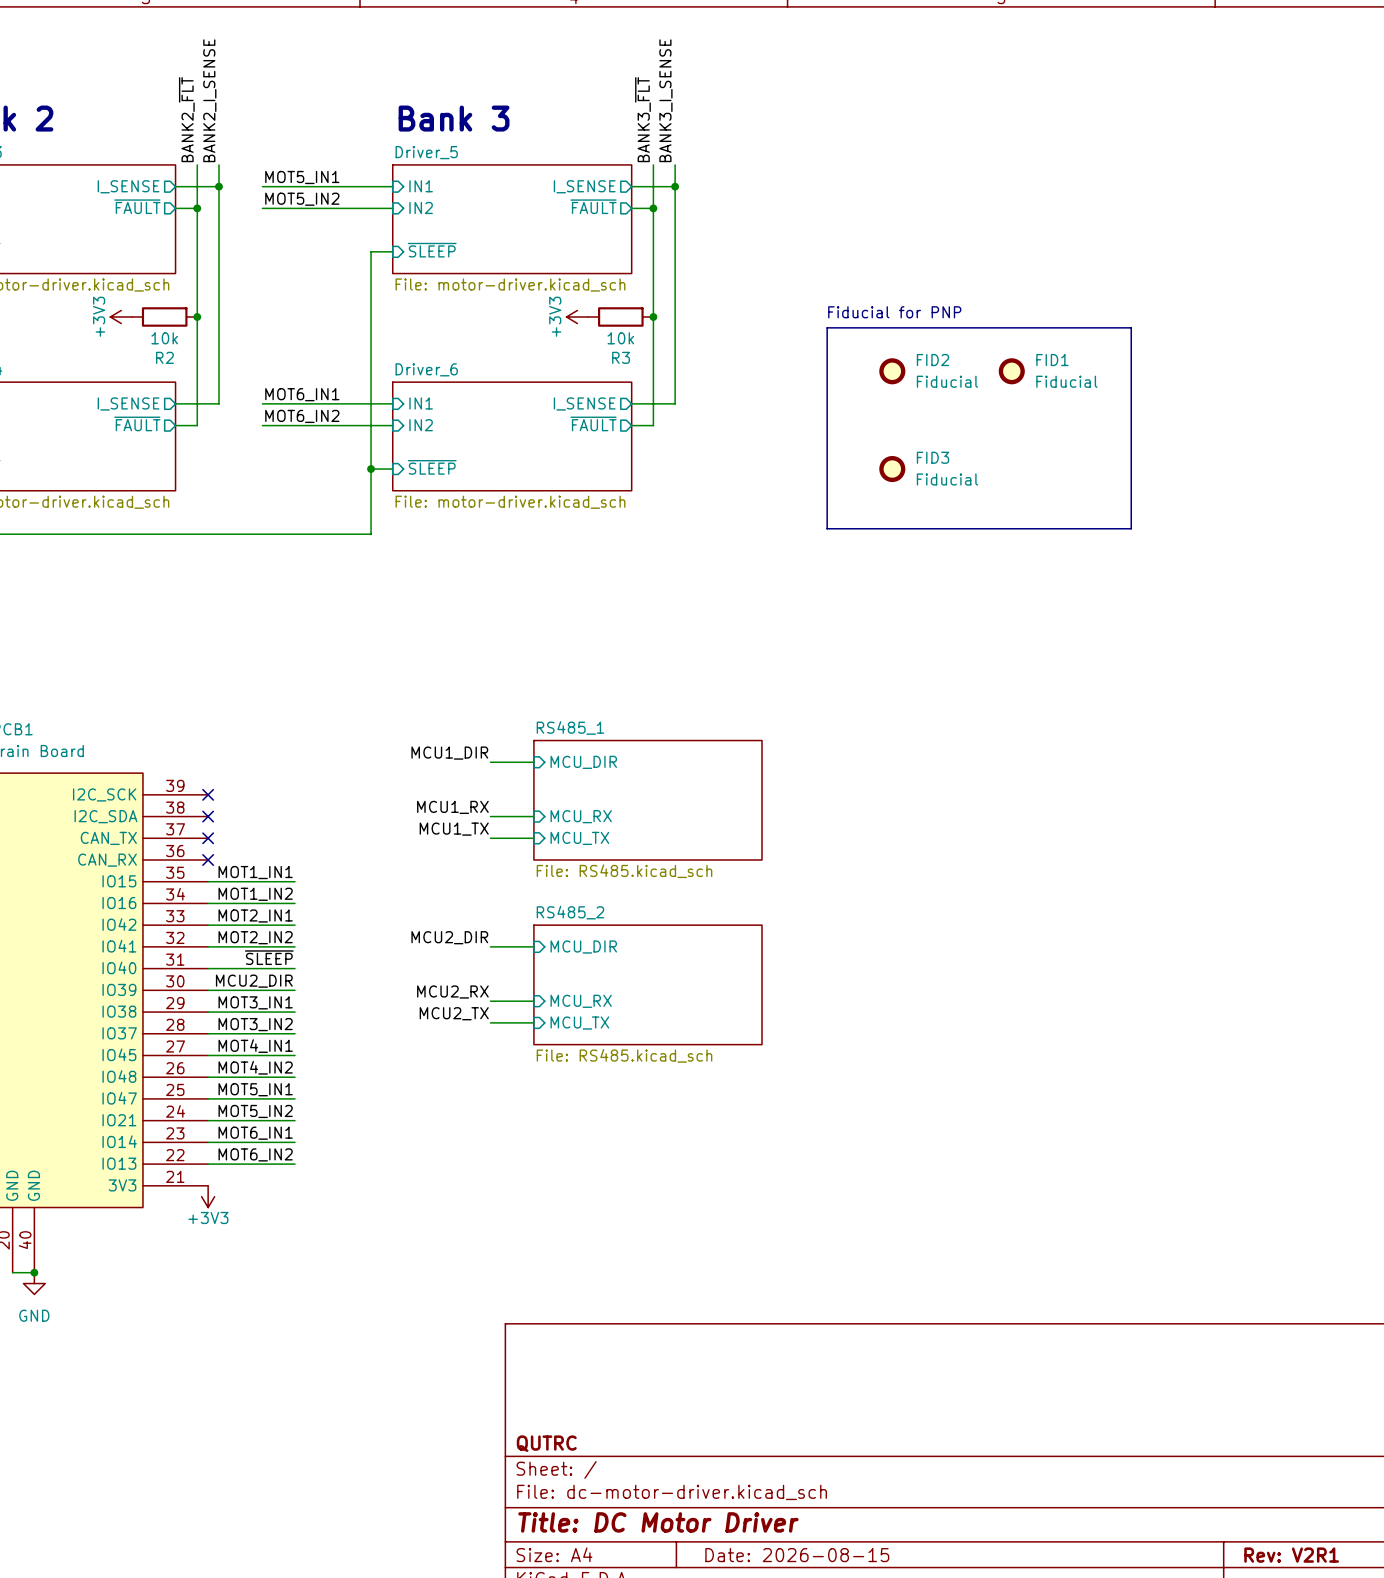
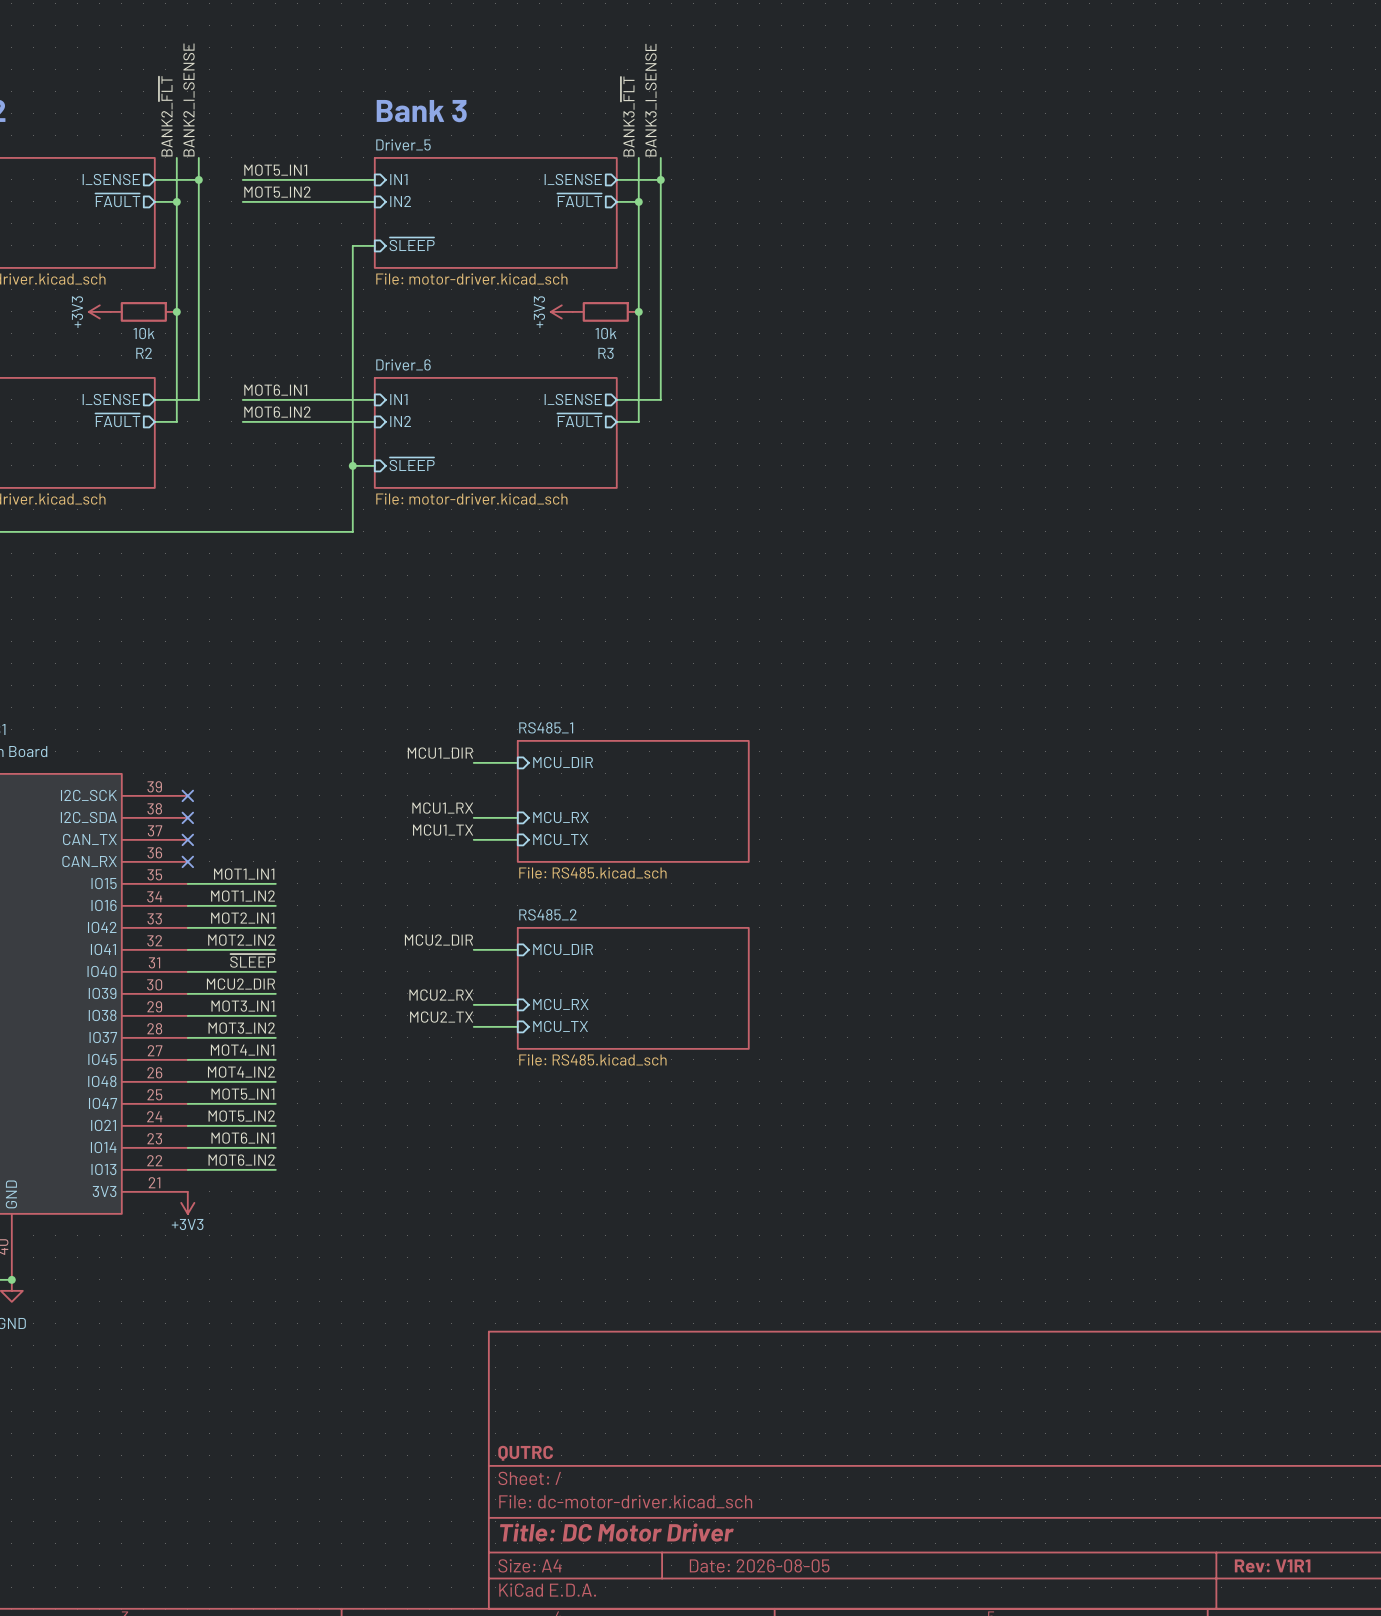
text: Fiducial for PNP (894, 312) -> none
line: (827, 327) (1131, 327) (1131, 528) (827, 528) (827, 327) -> none
FID2: Fiducial (892, 371) -> none
FID1: Fiducial (1011, 371) -> none
FID3: Fiducial (892, 469) -> none
title block: Date: 2026-08-15 (797, 1555) -> Date: 2026-08-05 (759, 1565)
title block: Rev: V2R1 (1291, 1555) -> Rev: V1R1 (1272, 1565)

